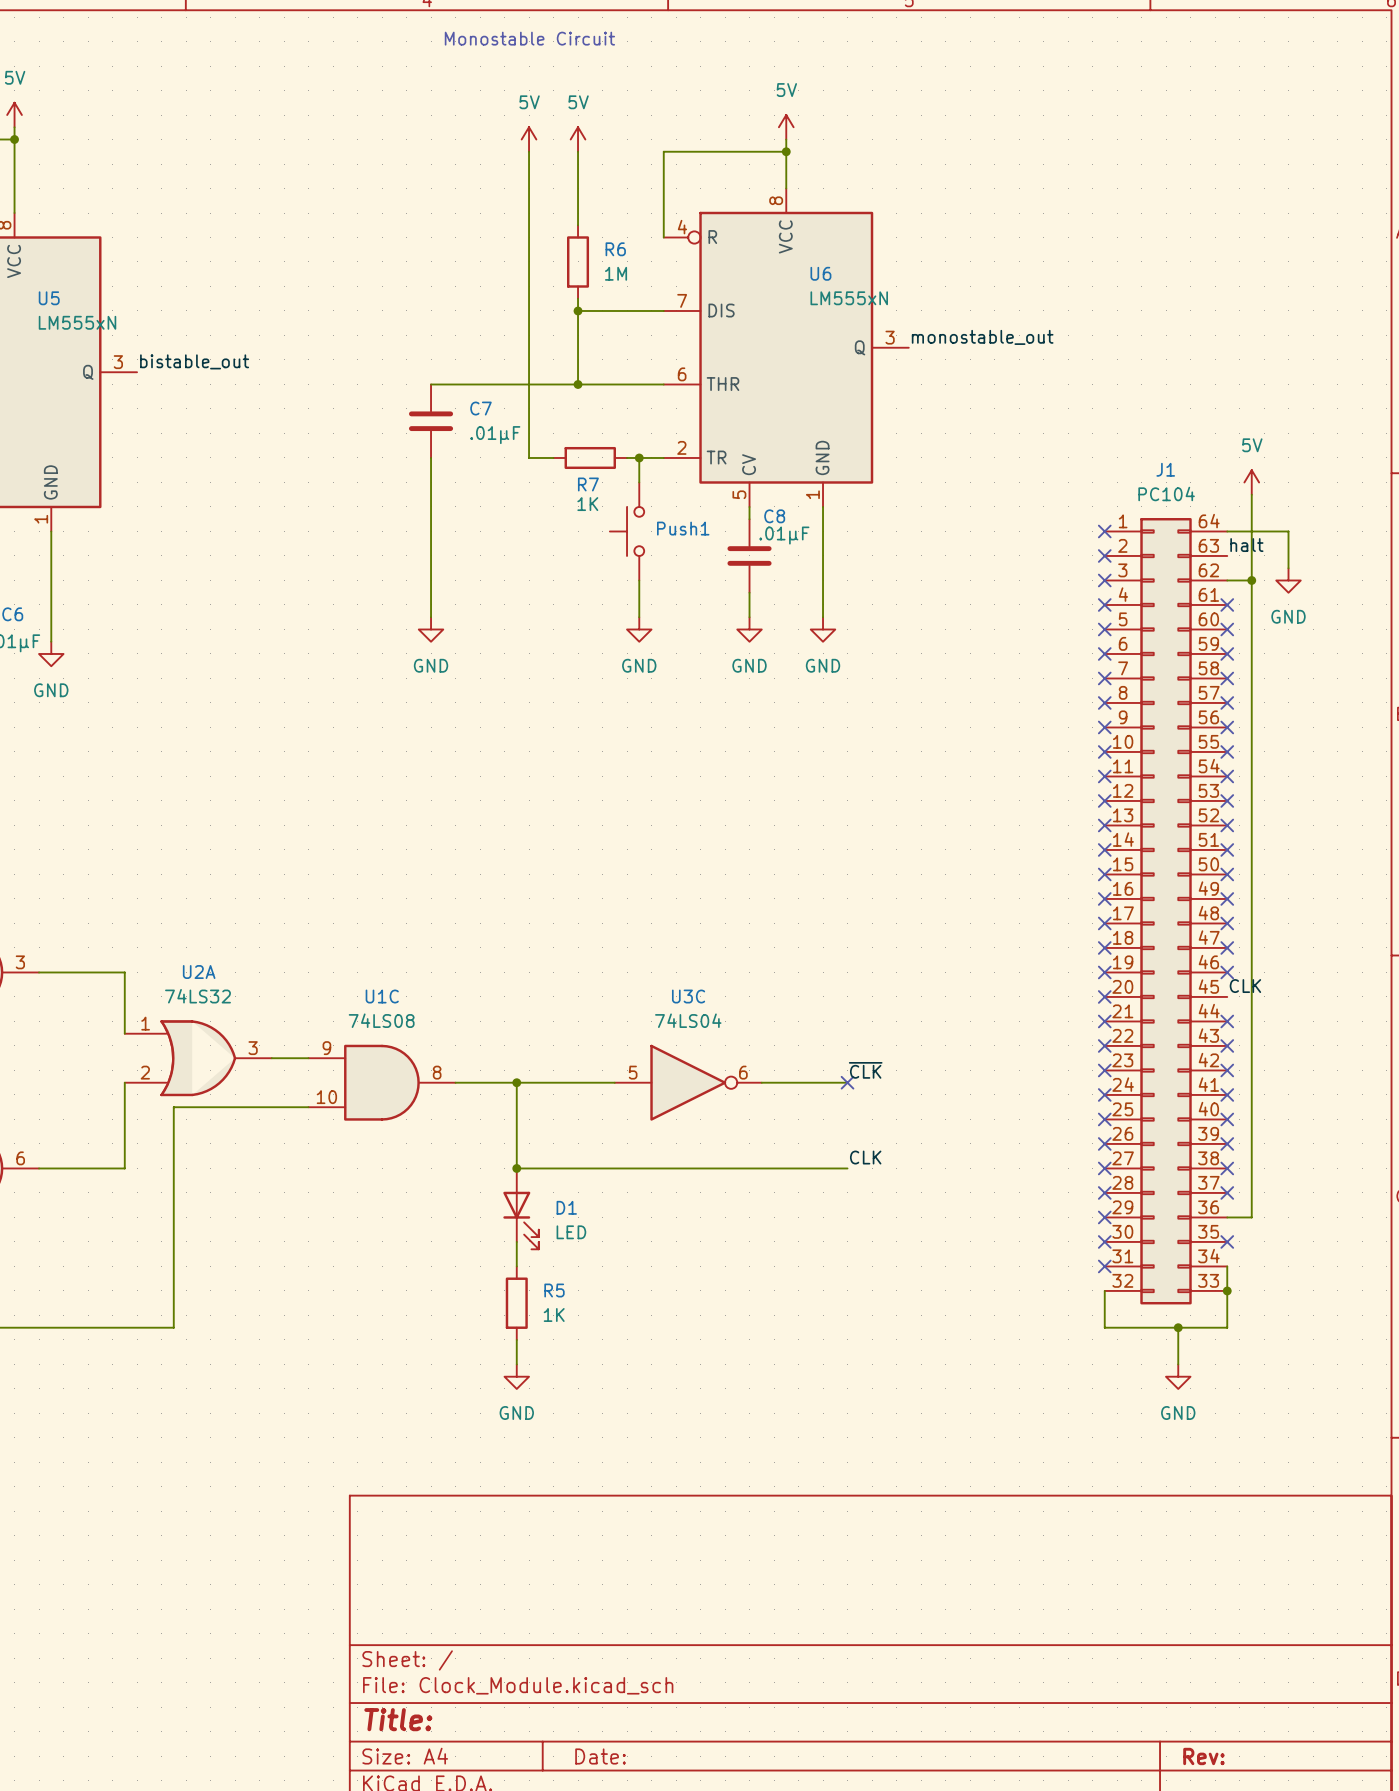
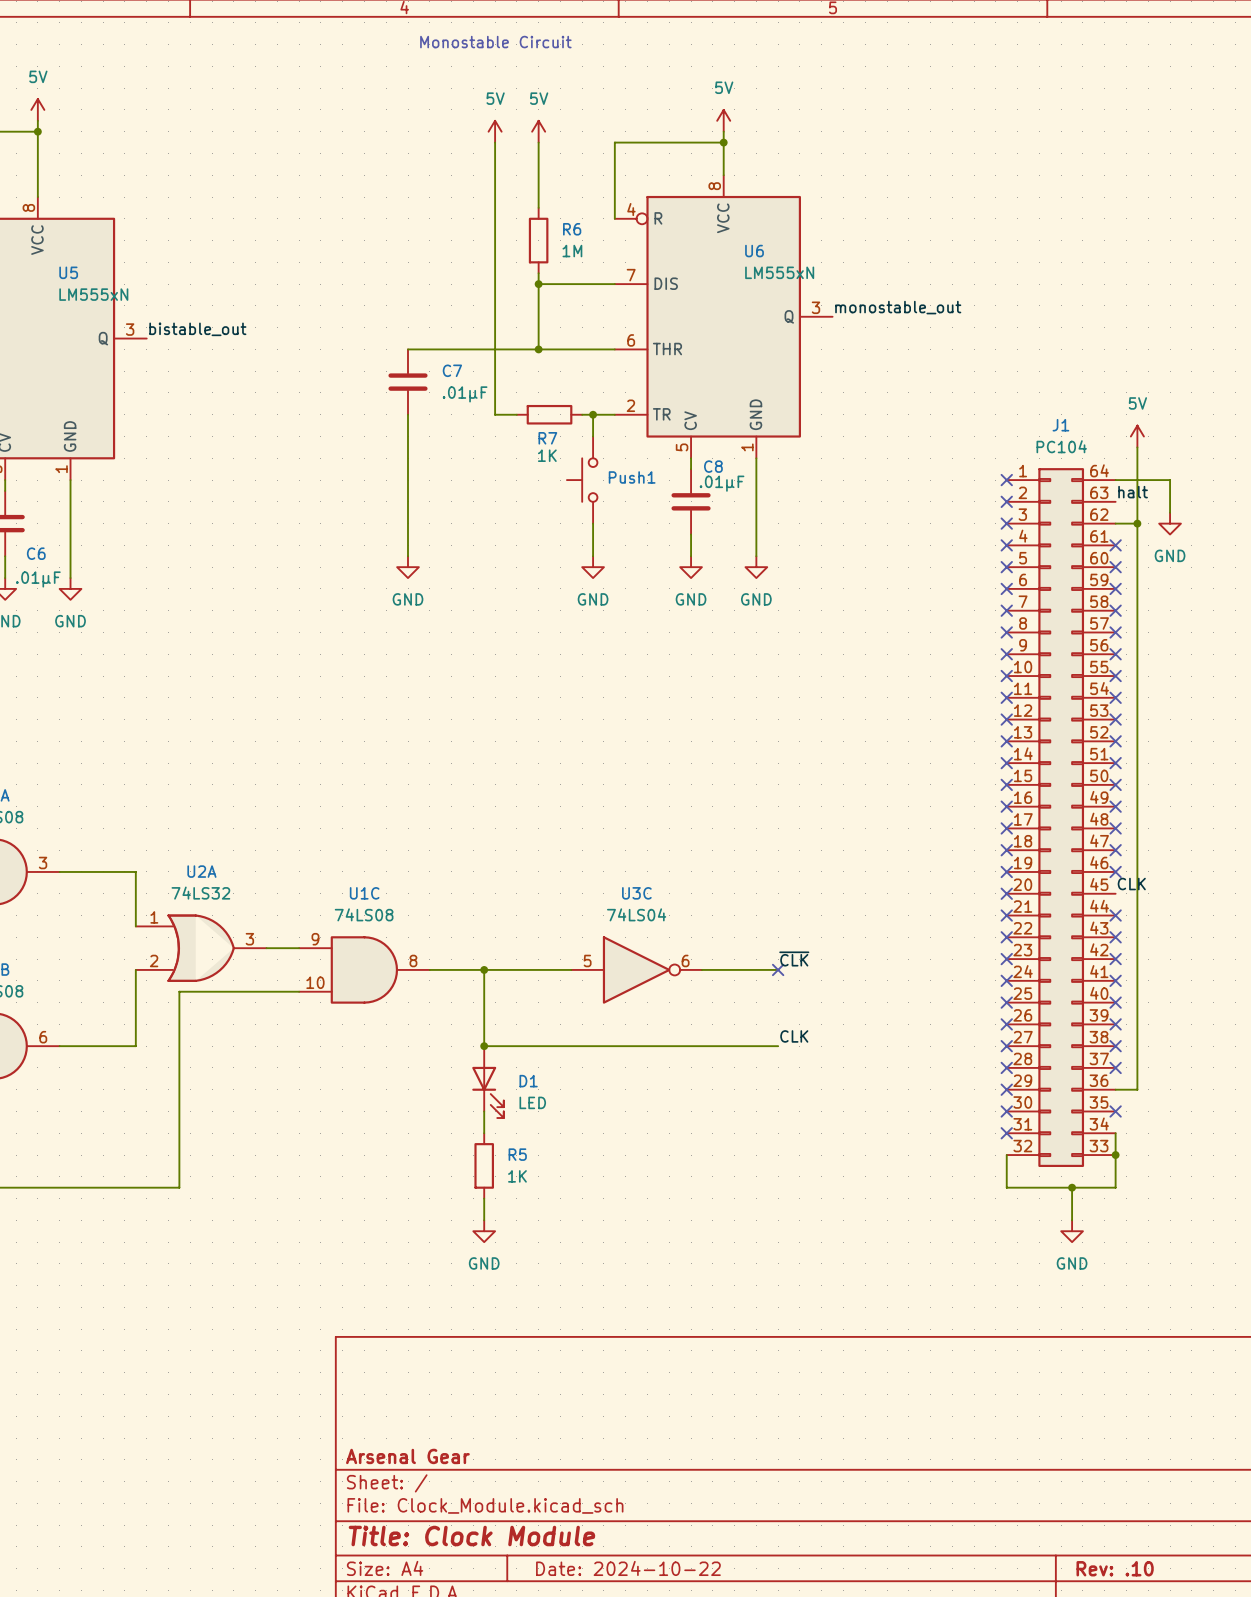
title block: none -> Arsenal Gear (407, 1456)
title block: Title: (398, 1719) -> Title: Clock Module (471, 1536)
title block: Date: (600, 1756) -> Date: 2024-10-22 (628, 1568)
title block: Rev: (1203, 1756) -> Rev: .10 (1115, 1568)

